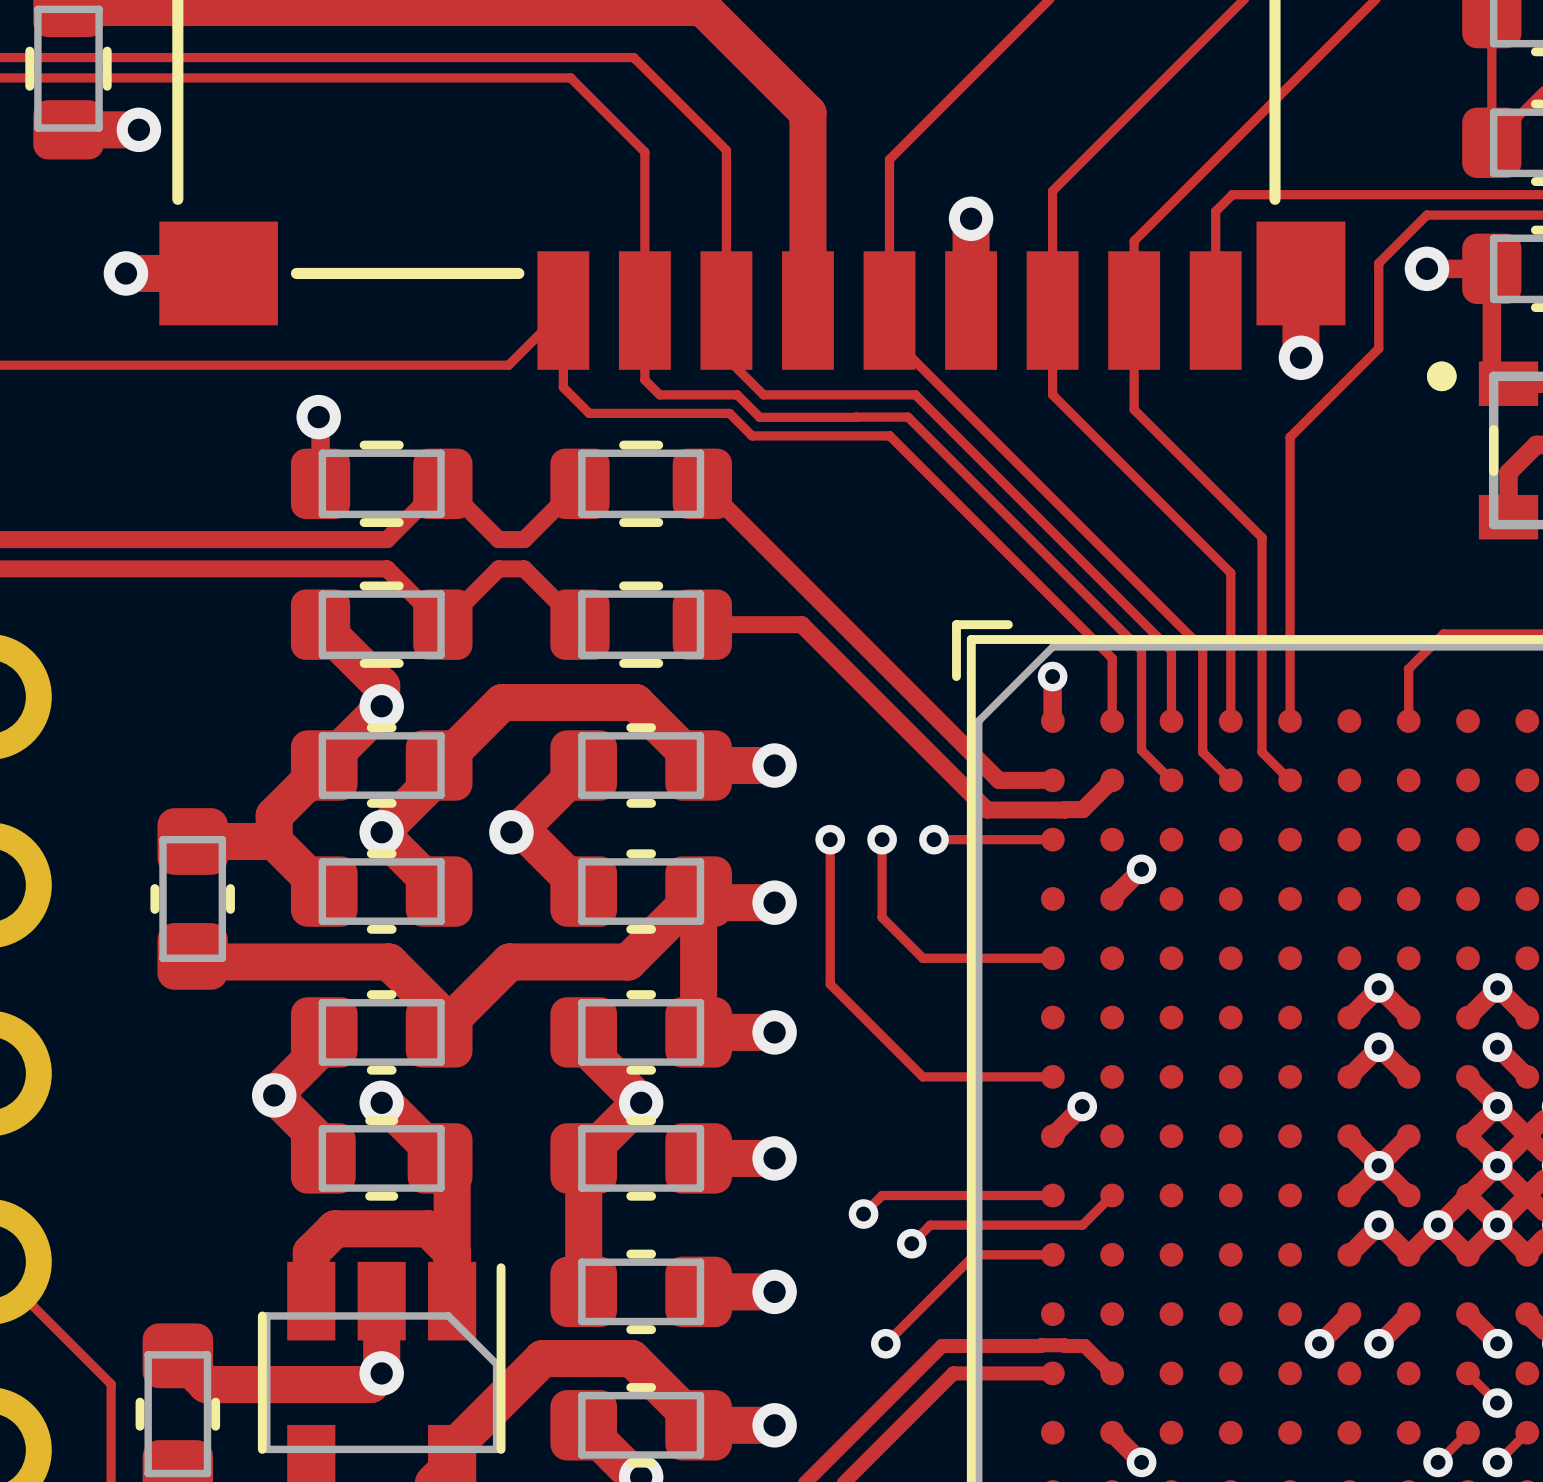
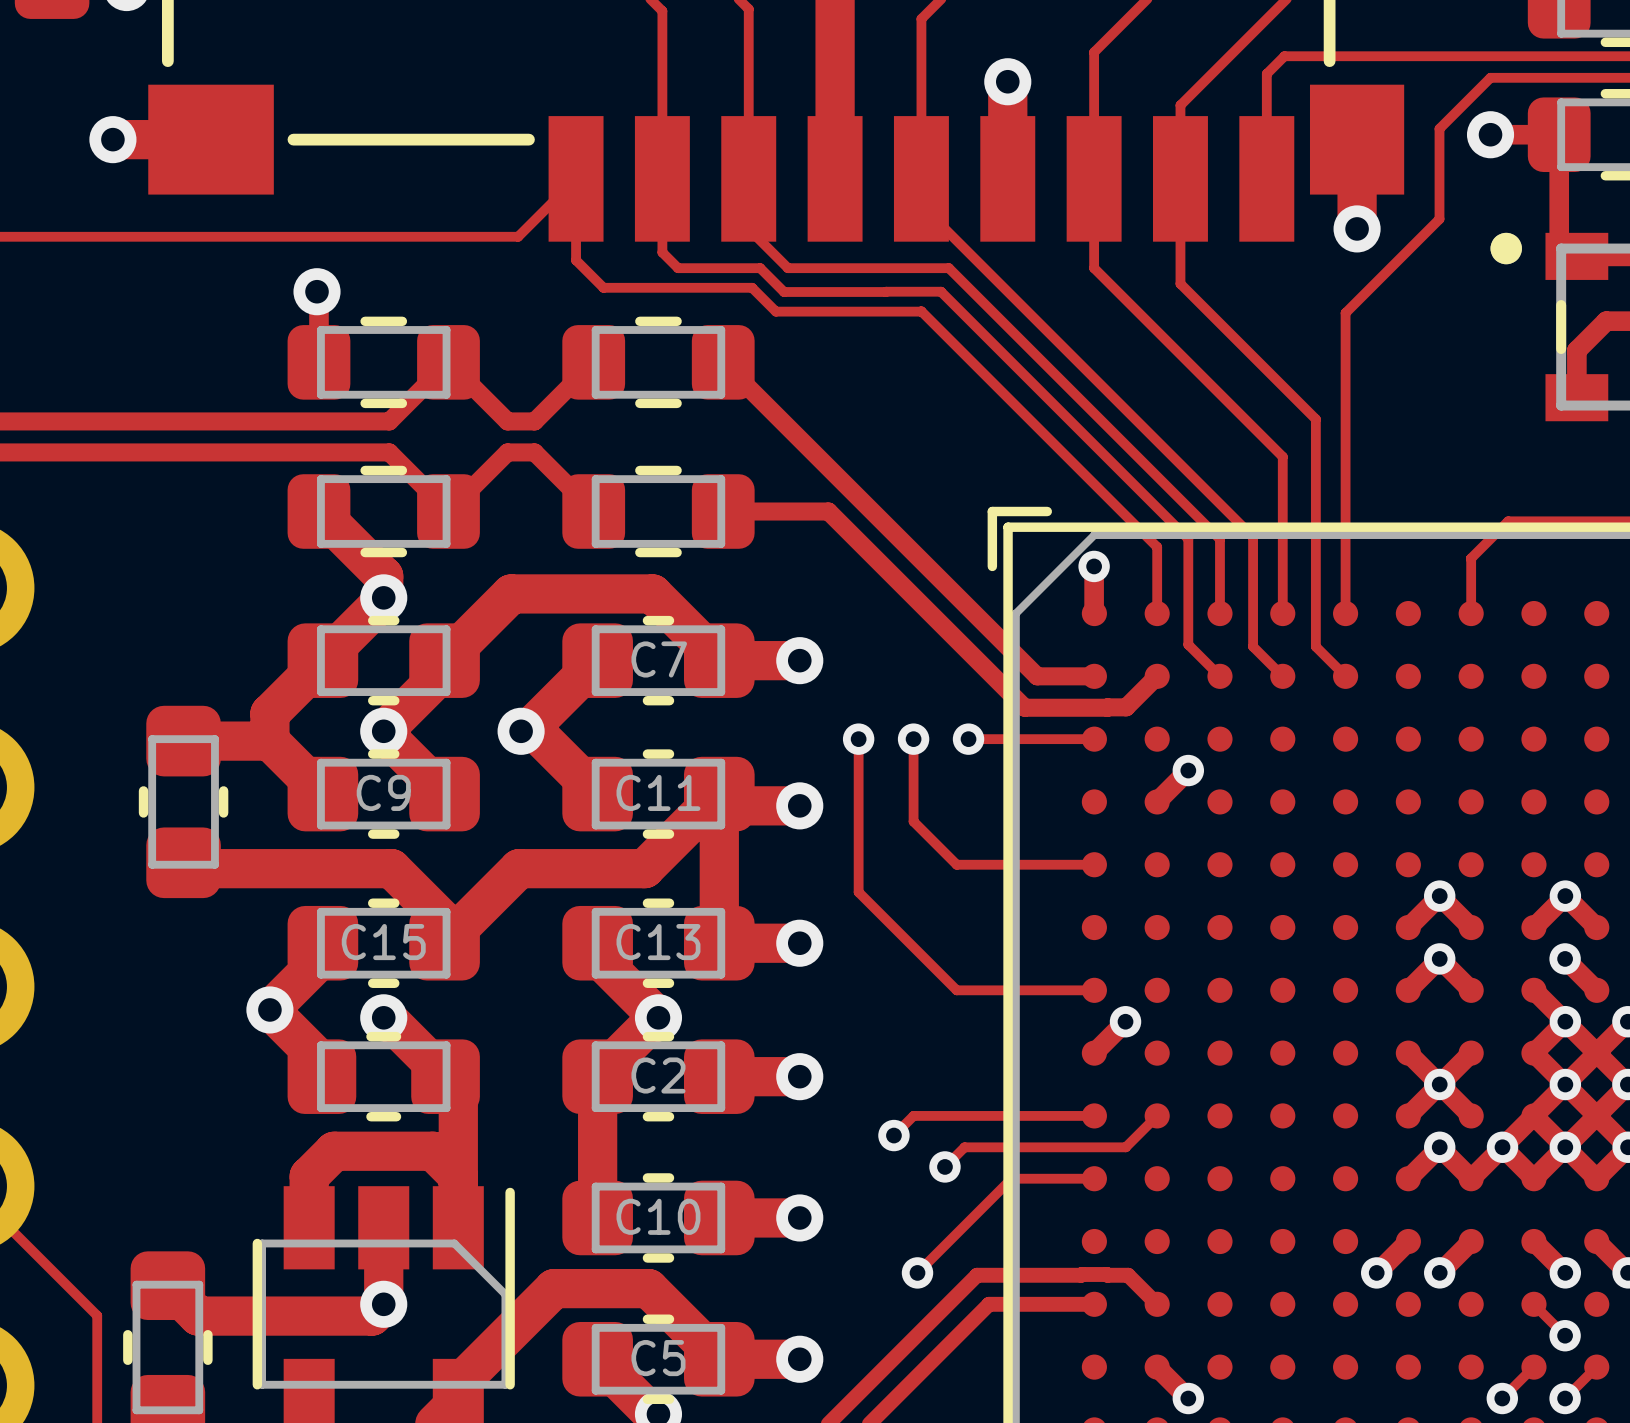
C7 name: none -> C7 (659, 659)
C9 name: none -> C9 (383, 792)
C11 name: none -> C11 (658, 792)
C15 name: none -> C15 (383, 942)
C13 name: none -> C13 (658, 942)
C2 name: none -> C2 (658, 1075)
C10 name: none -> C10 (658, 1216)
C5 name: none -> C5 (658, 1358)

